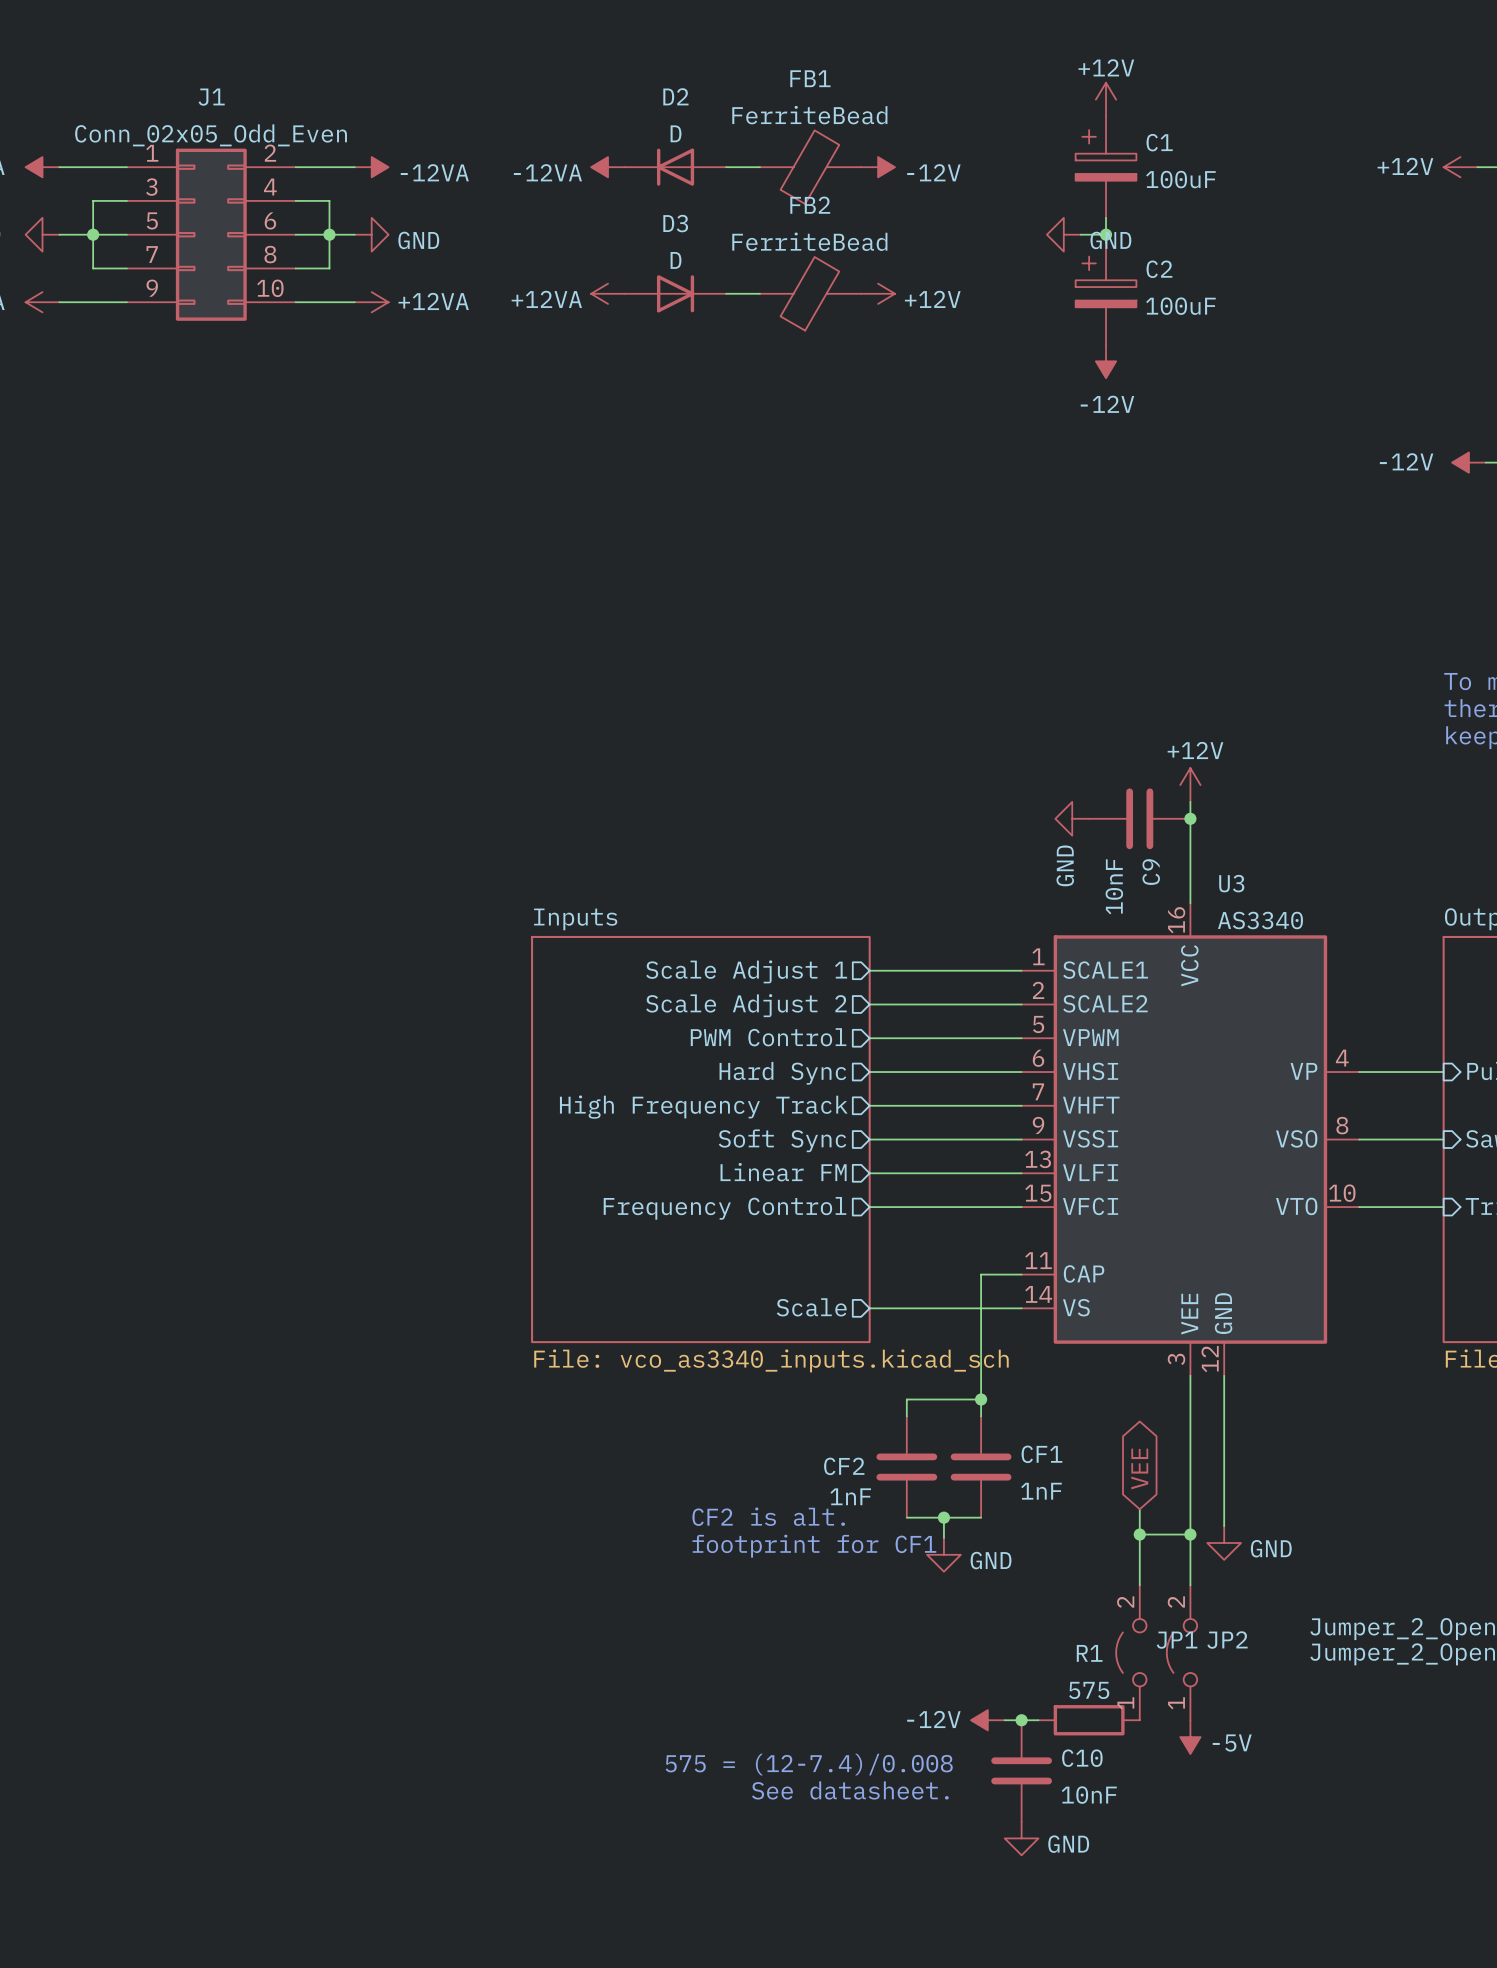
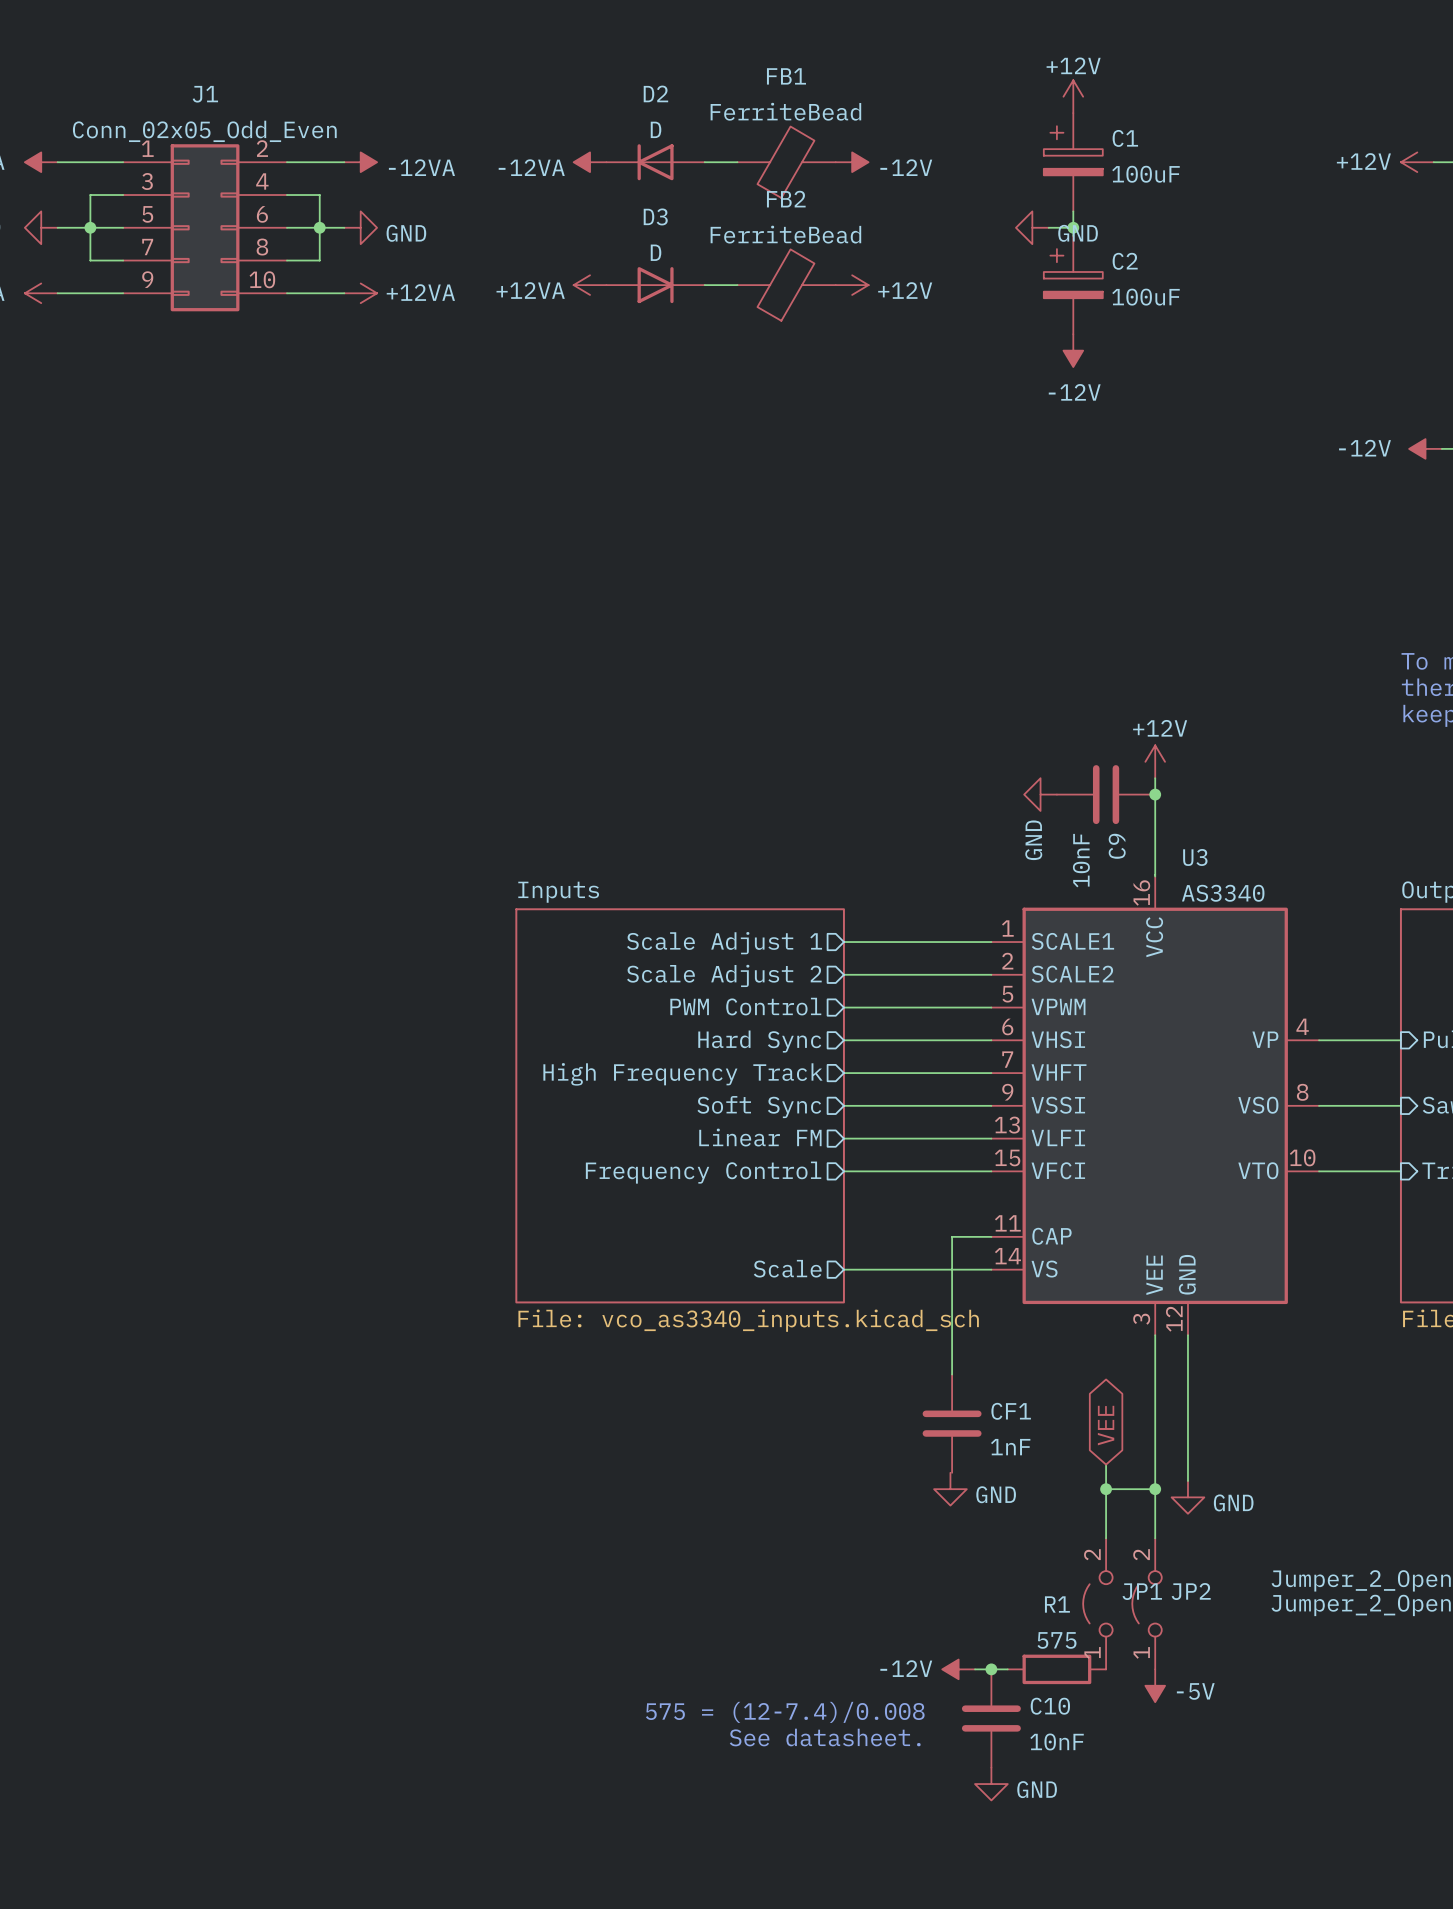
wire: (981, 1399) (906, 1399) (906, 1416) -> none
junction: (981, 1399) -> none
CF2: 1nF (906, 1467) -> none
text: CF2 is alt. (768, 1516) -> none
wire: (906, 1517) (981, 1517) -> none
wire: (943, 1517) (943, 1537) -> none
junction: (943, 1517) -> none
text: footprint for CF1 (814, 1546) -> none
power symbol position: GND (943, 1554) -> GND (950, 1489)

